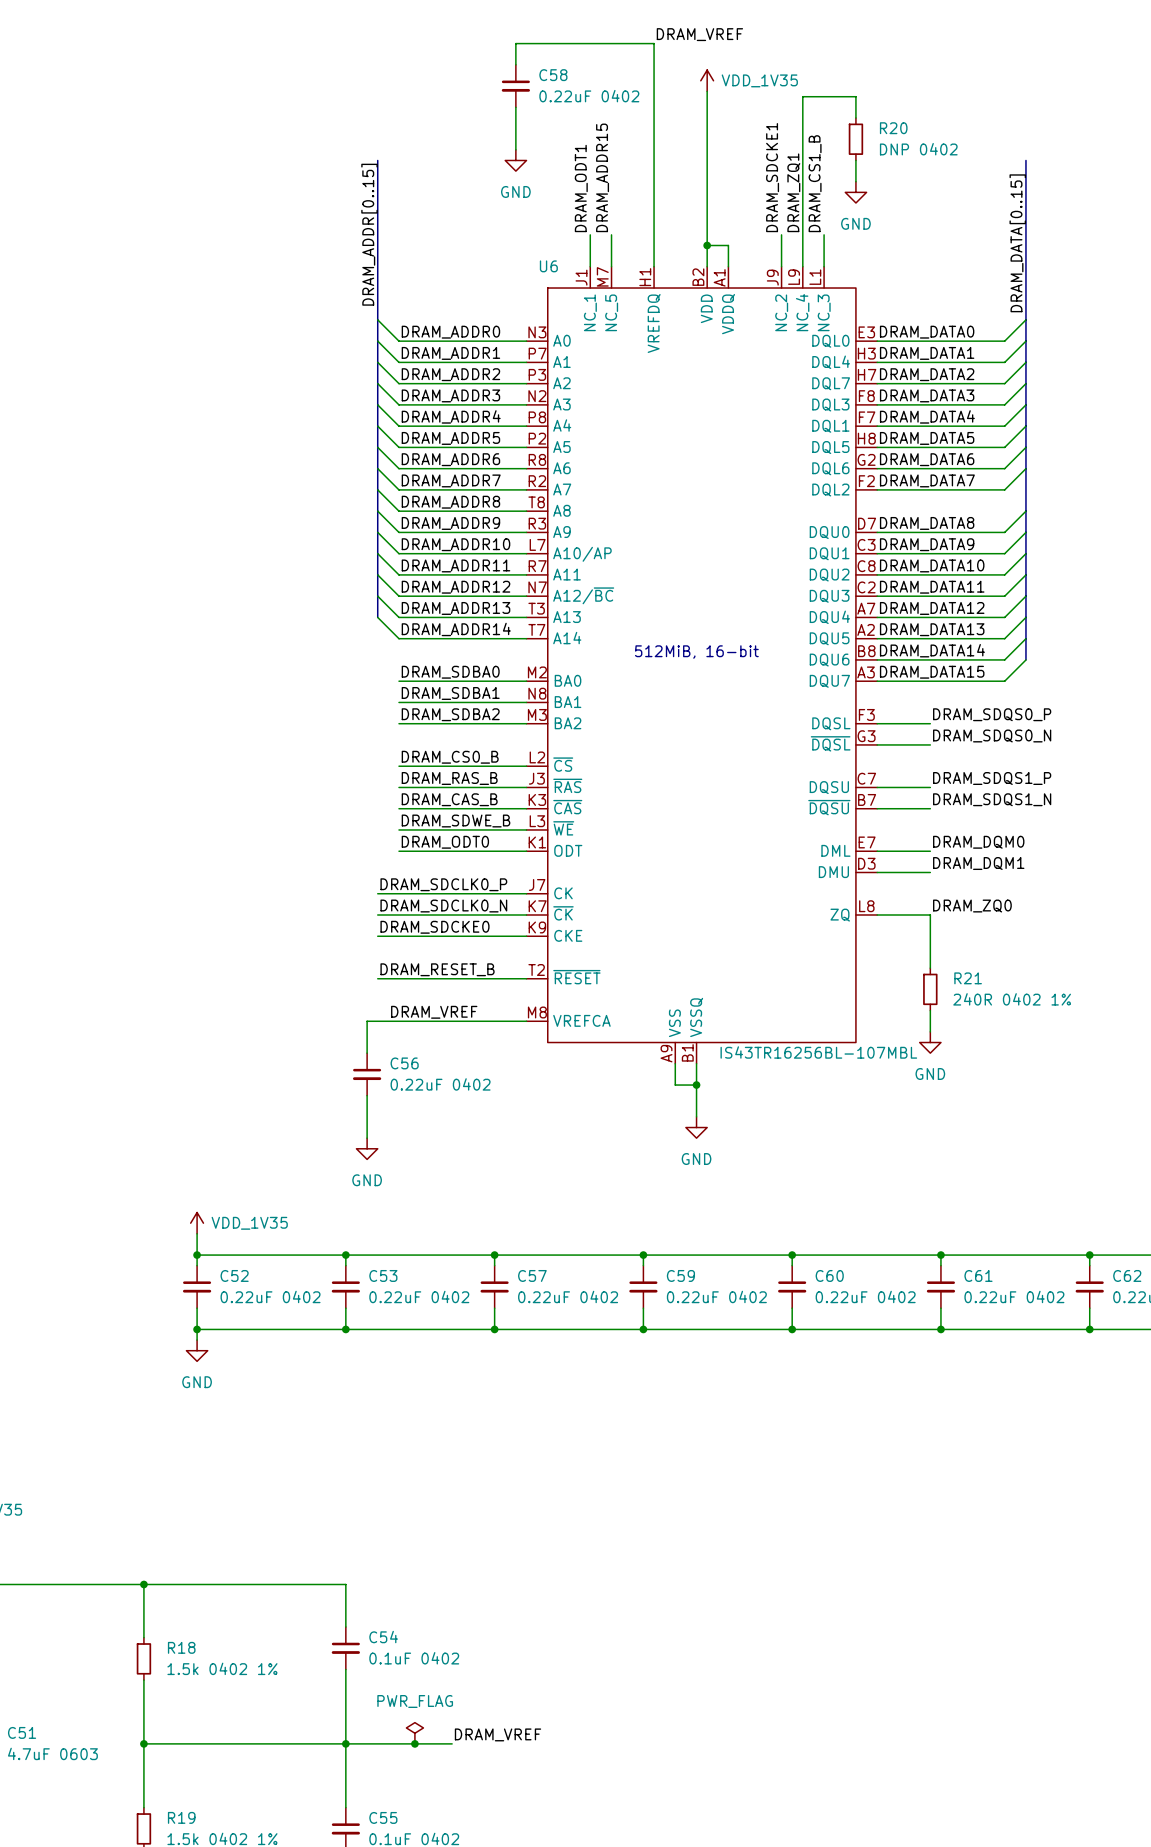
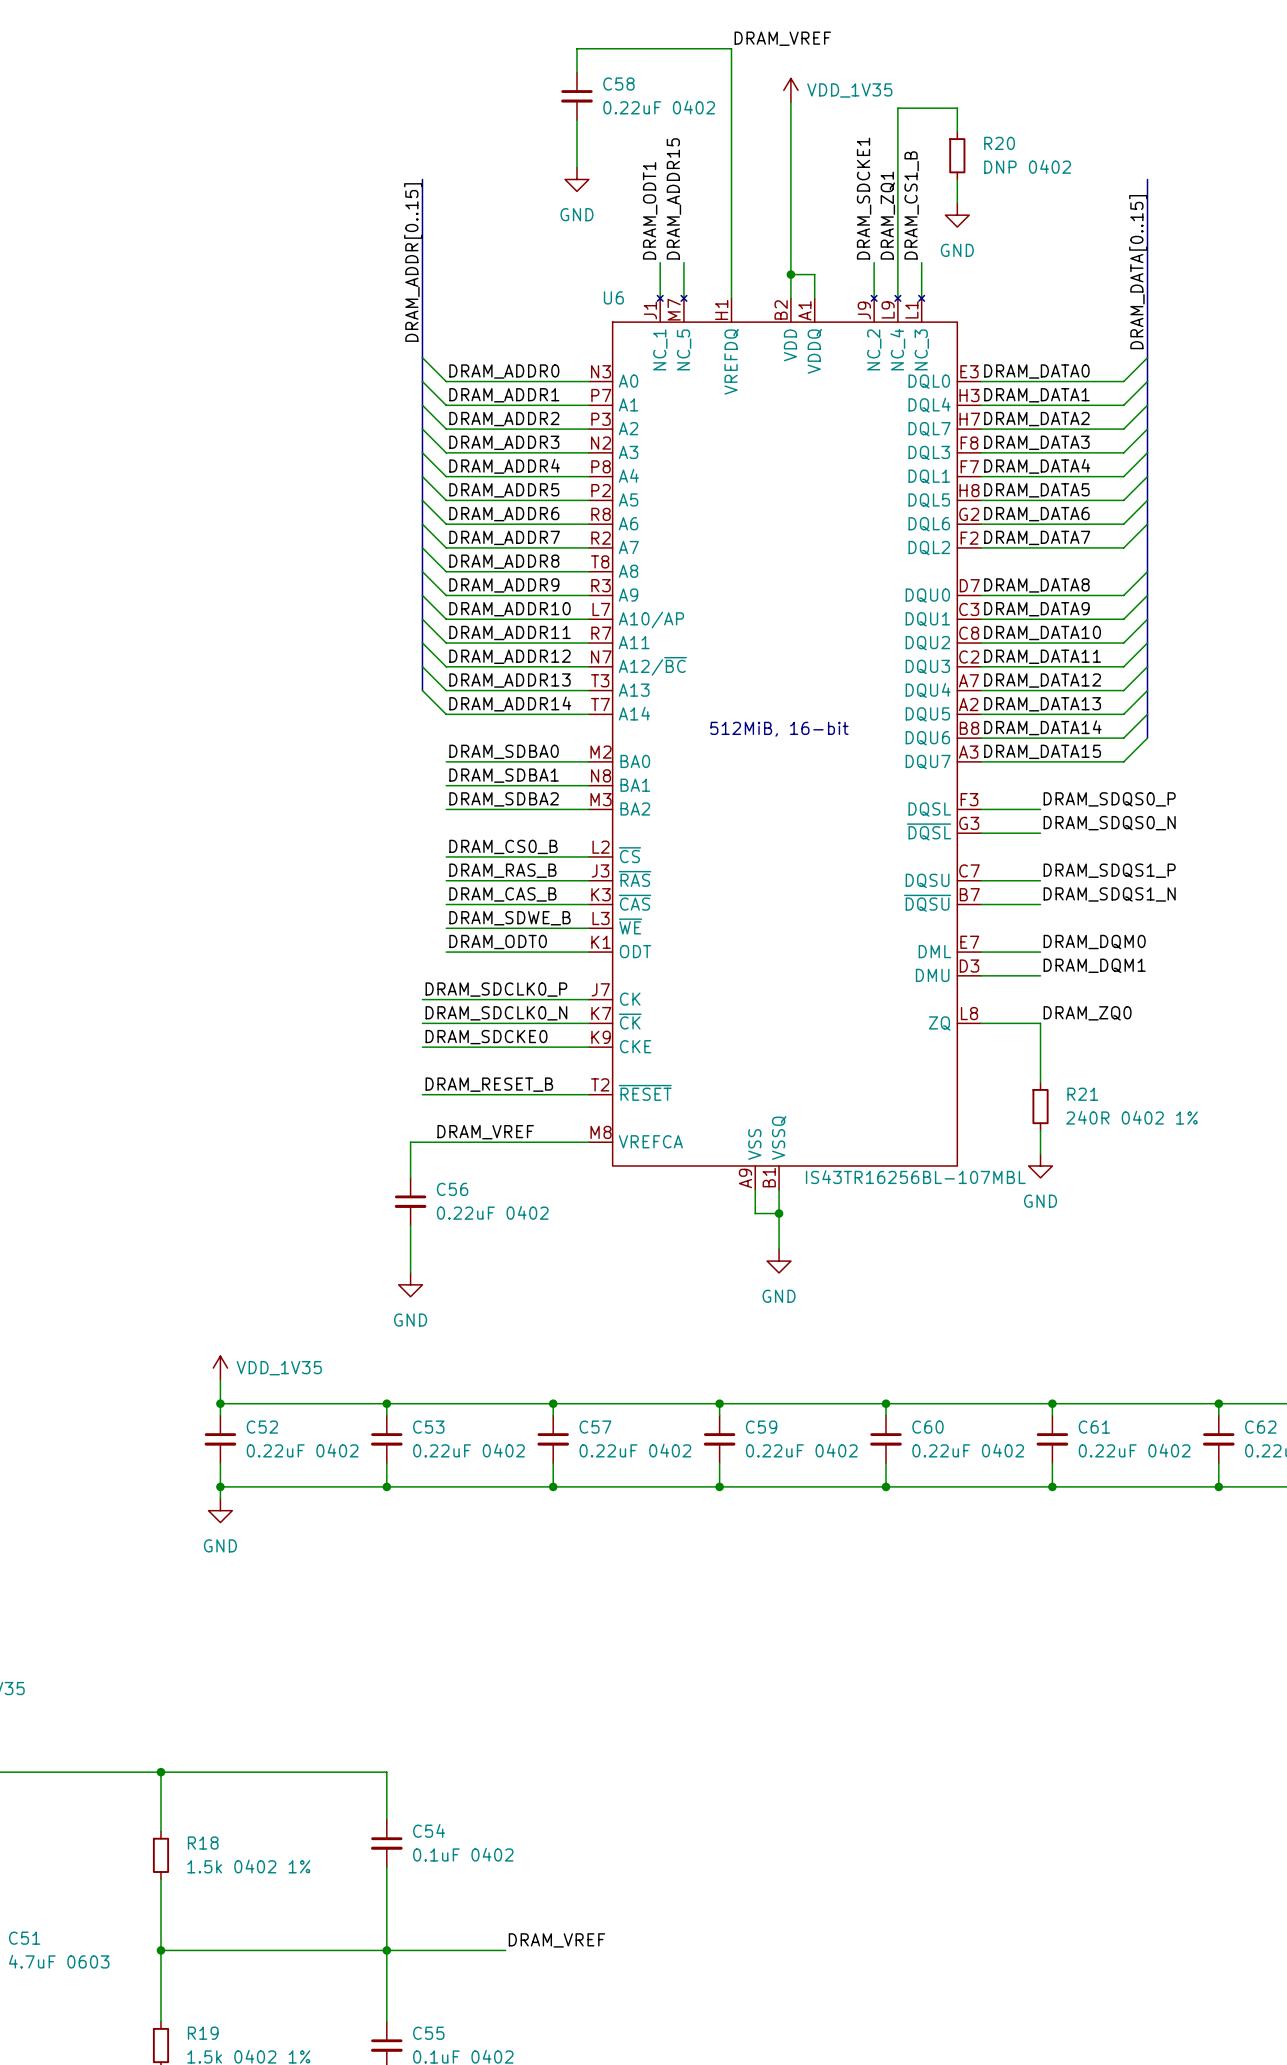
U6 symbol: [526, 266, 878, 1064] -> [588, 295, 982, 1190]
power symbol: PWR_FLAG (414, 1733) -> none
junction: (414, 1743) -> none

